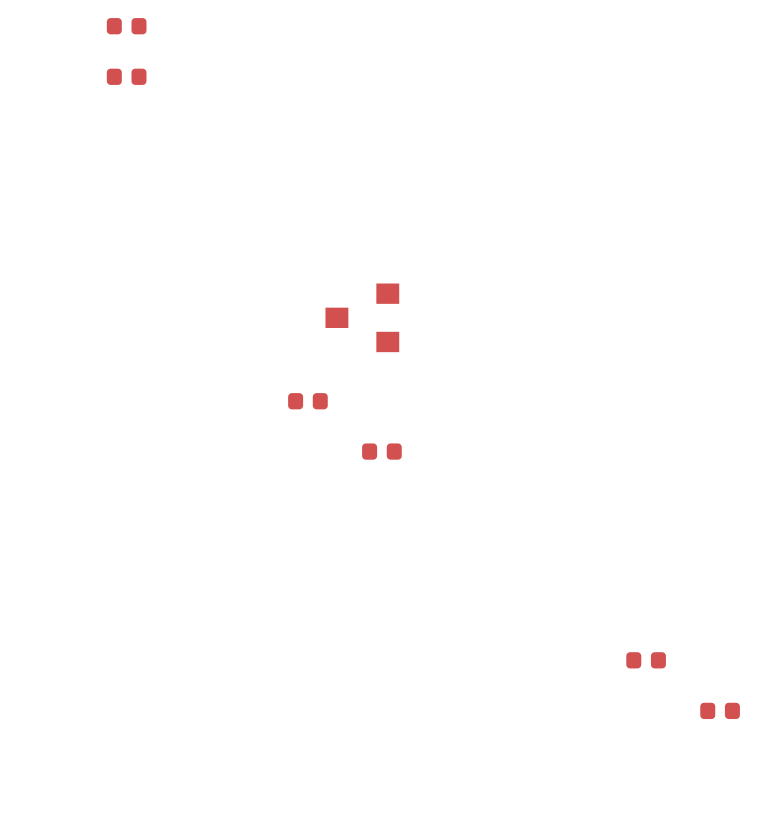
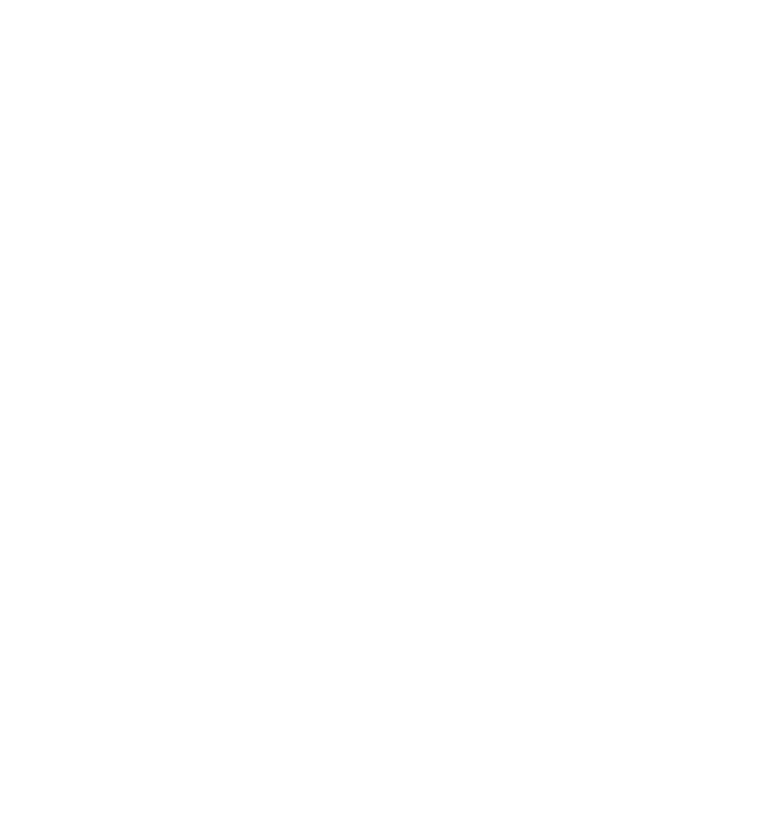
part: (126, 26) -> none
part: (126, 76) -> none
part: (362, 317) -> none
part: (307, 401) -> none
part: (381, 451) -> none
part: (646, 660) -> none
part: (720, 710) -> none

